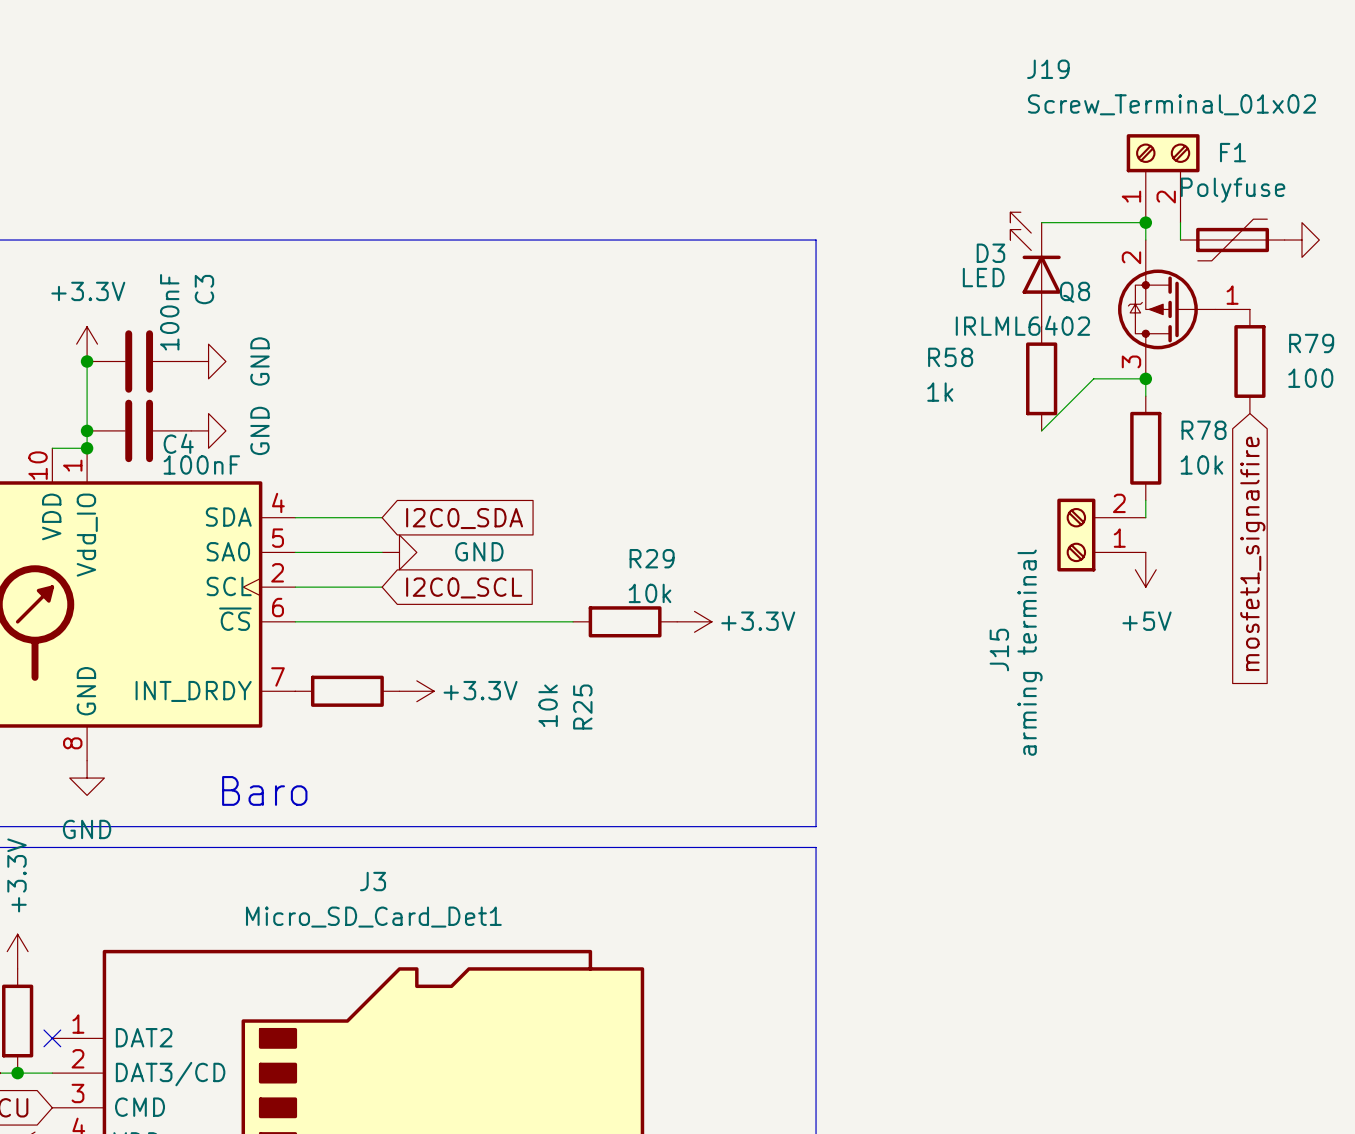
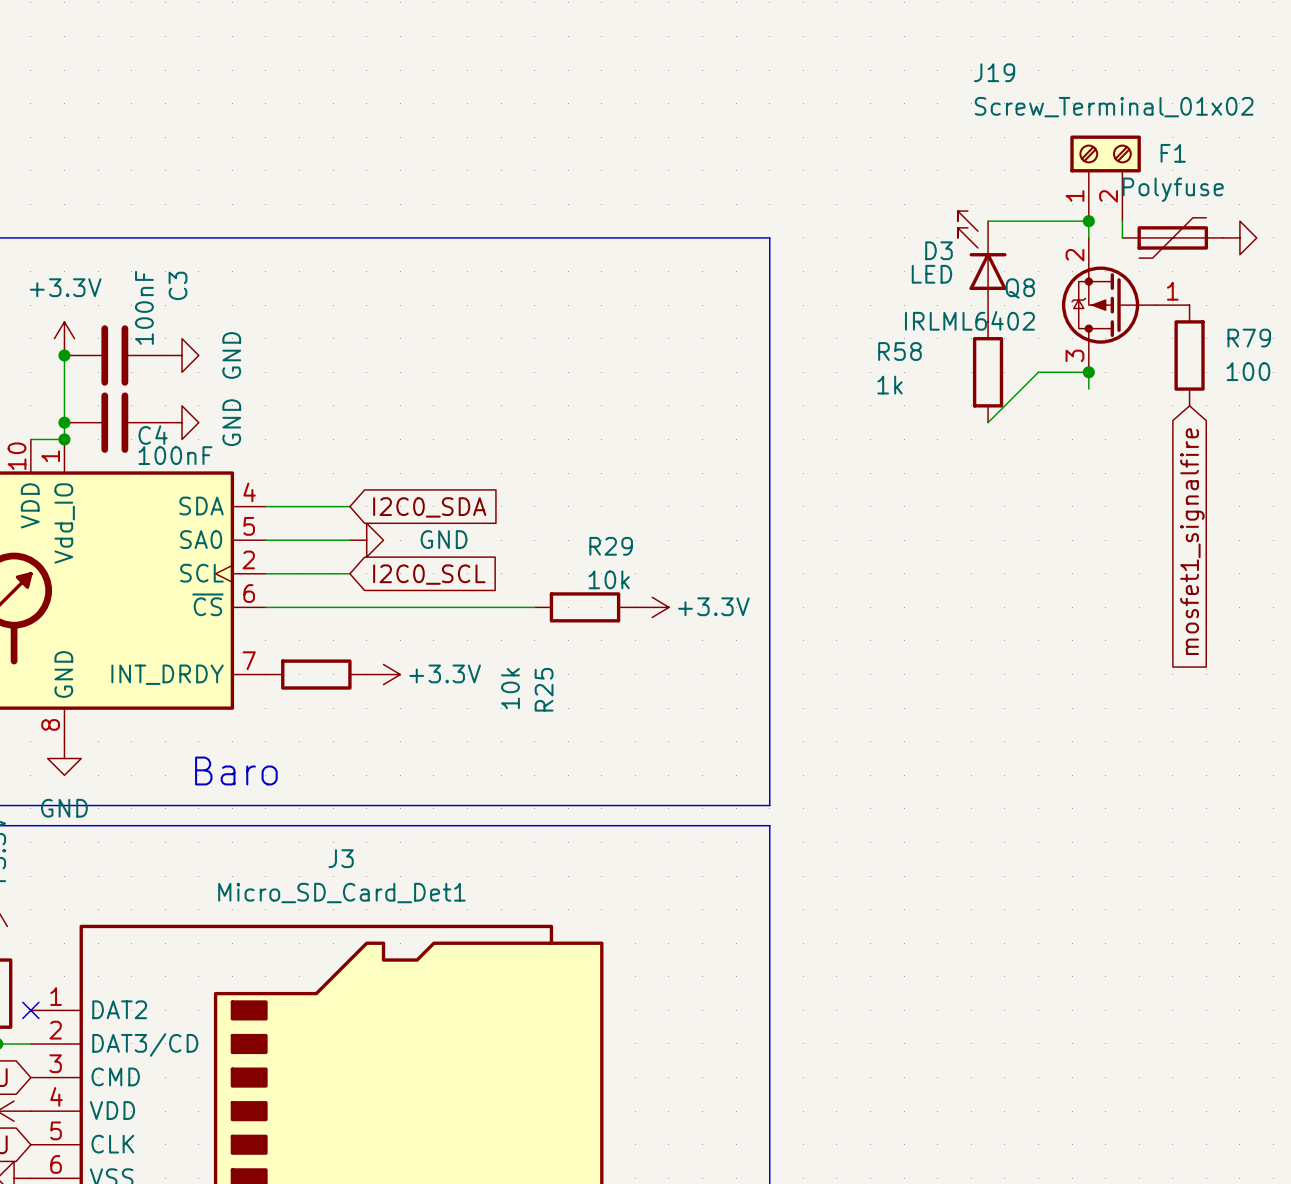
R78: 10k (1145, 448) -> none
wire: (1145, 500) (1145, 517) -> none
J15: arming terminal (1101, 535) -> none
power symbol: +5V (1145, 569) -> none

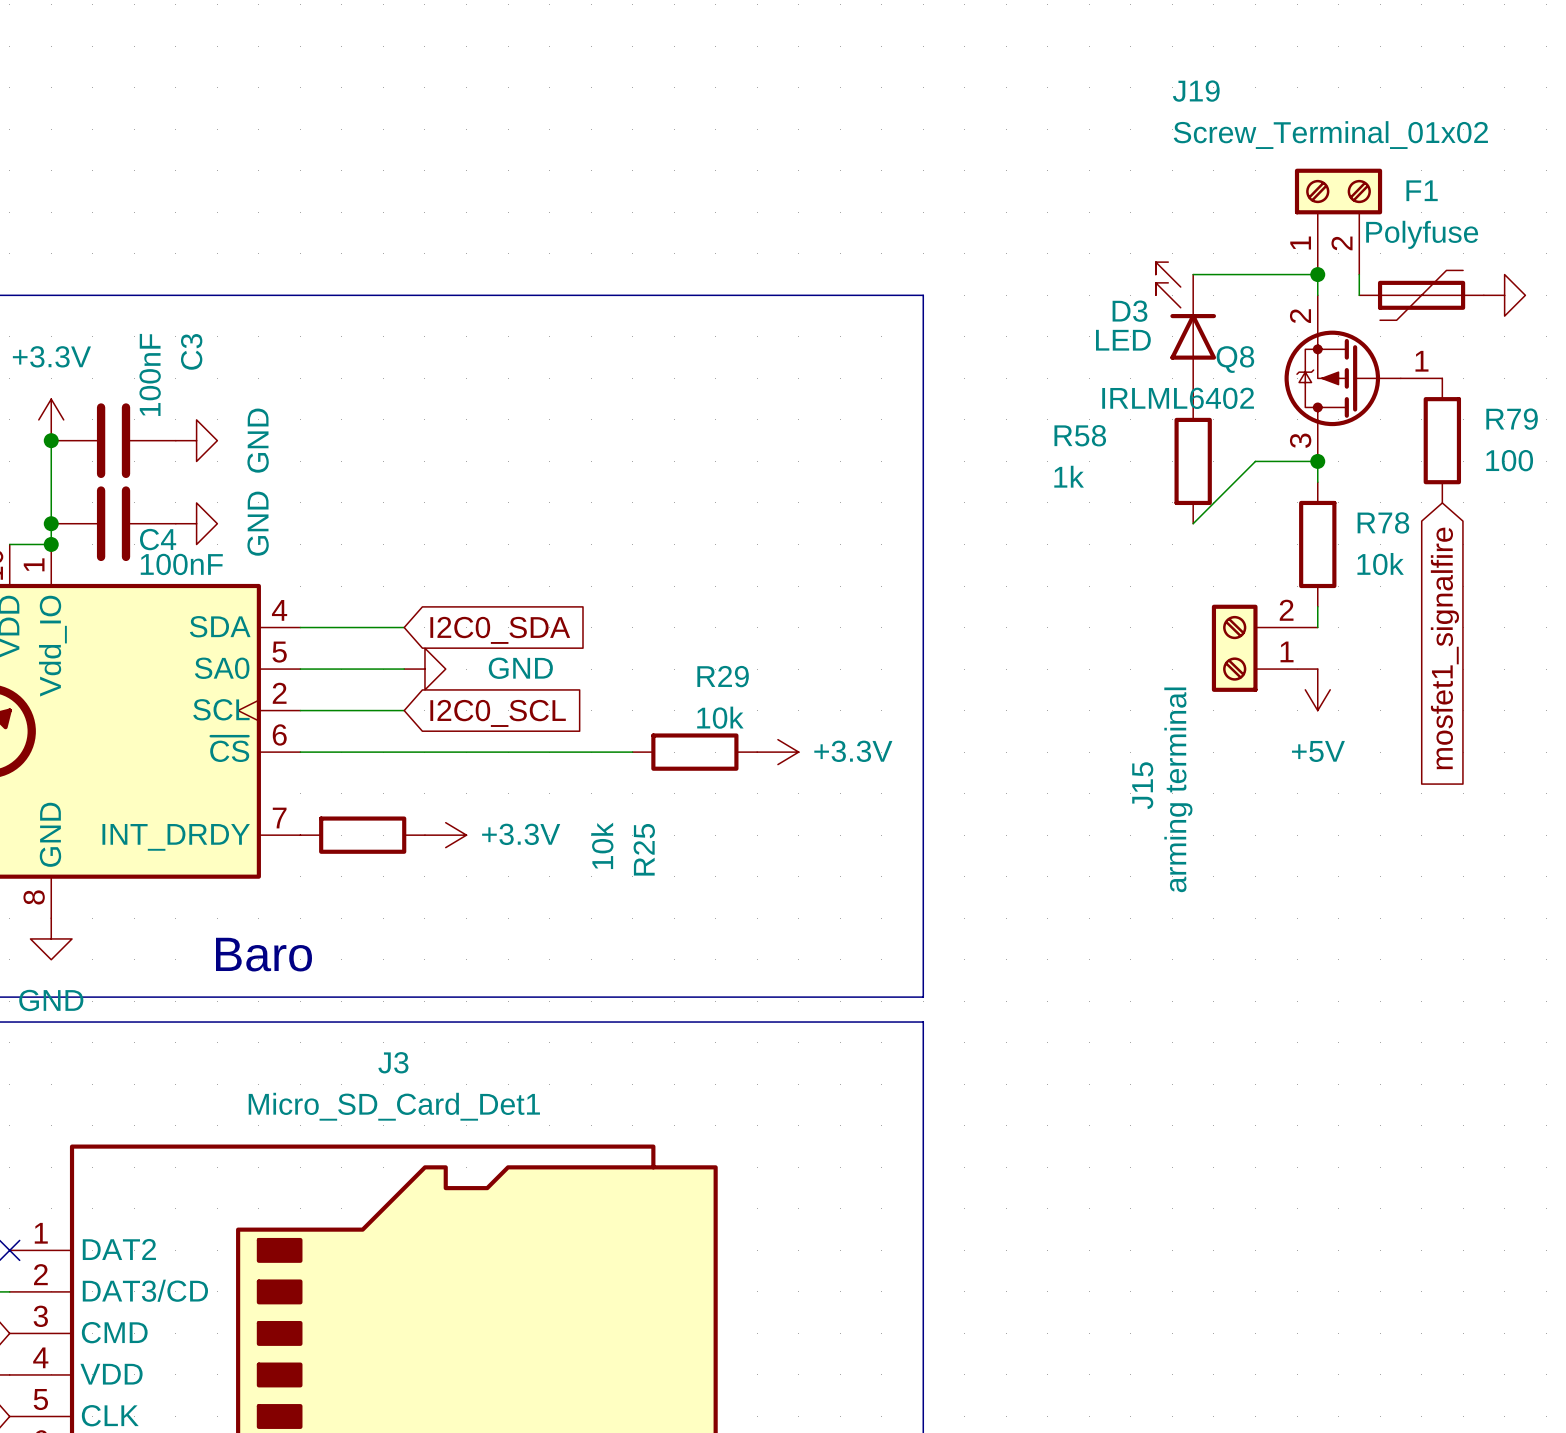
R78: none -> 10k (1317, 544)
wire: none -> (1317, 606) (1317, 627)
J15: none -> arming terminal (1264, 648)
power symbol: none -> +5V (1317, 689)

